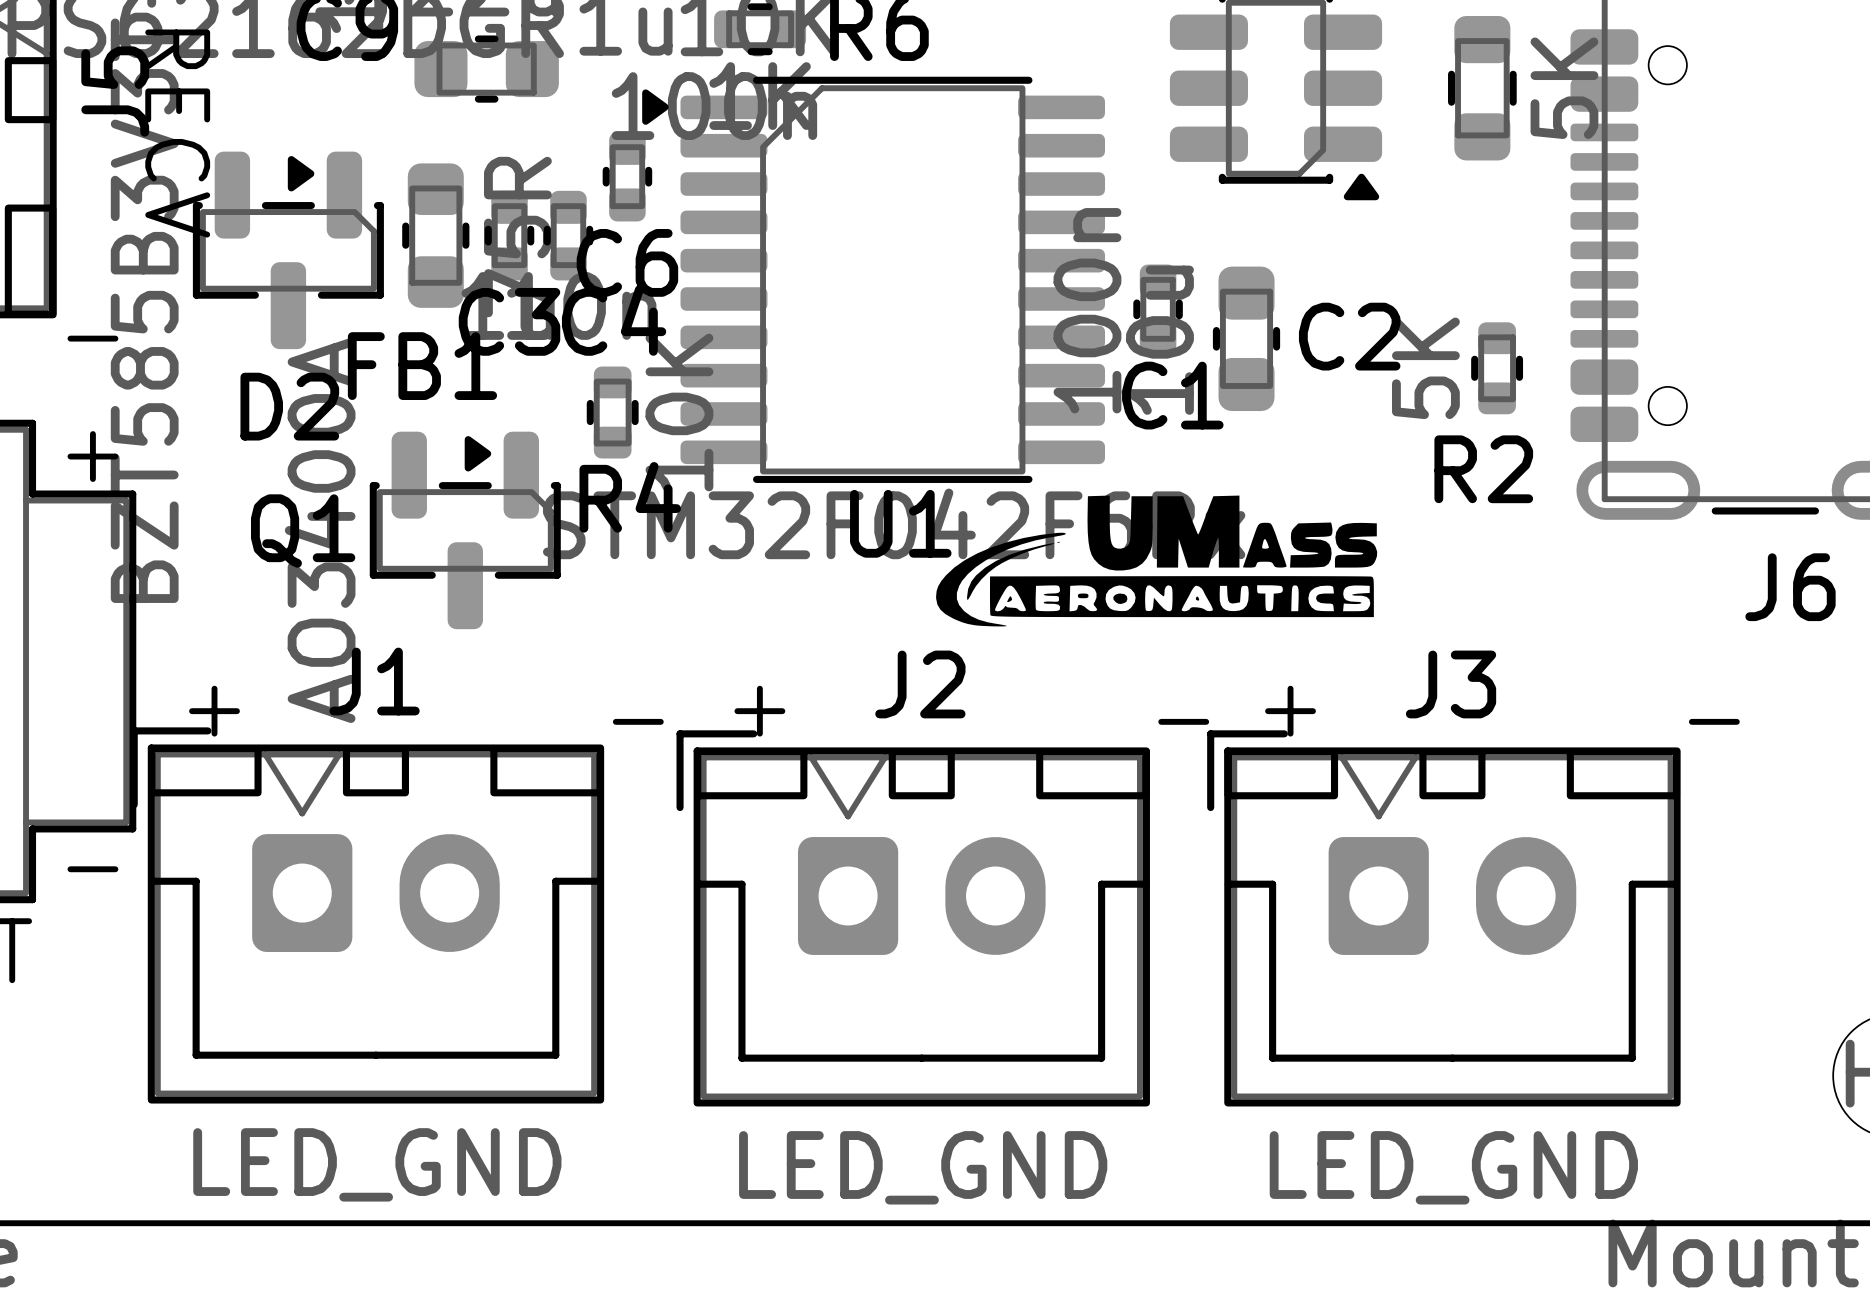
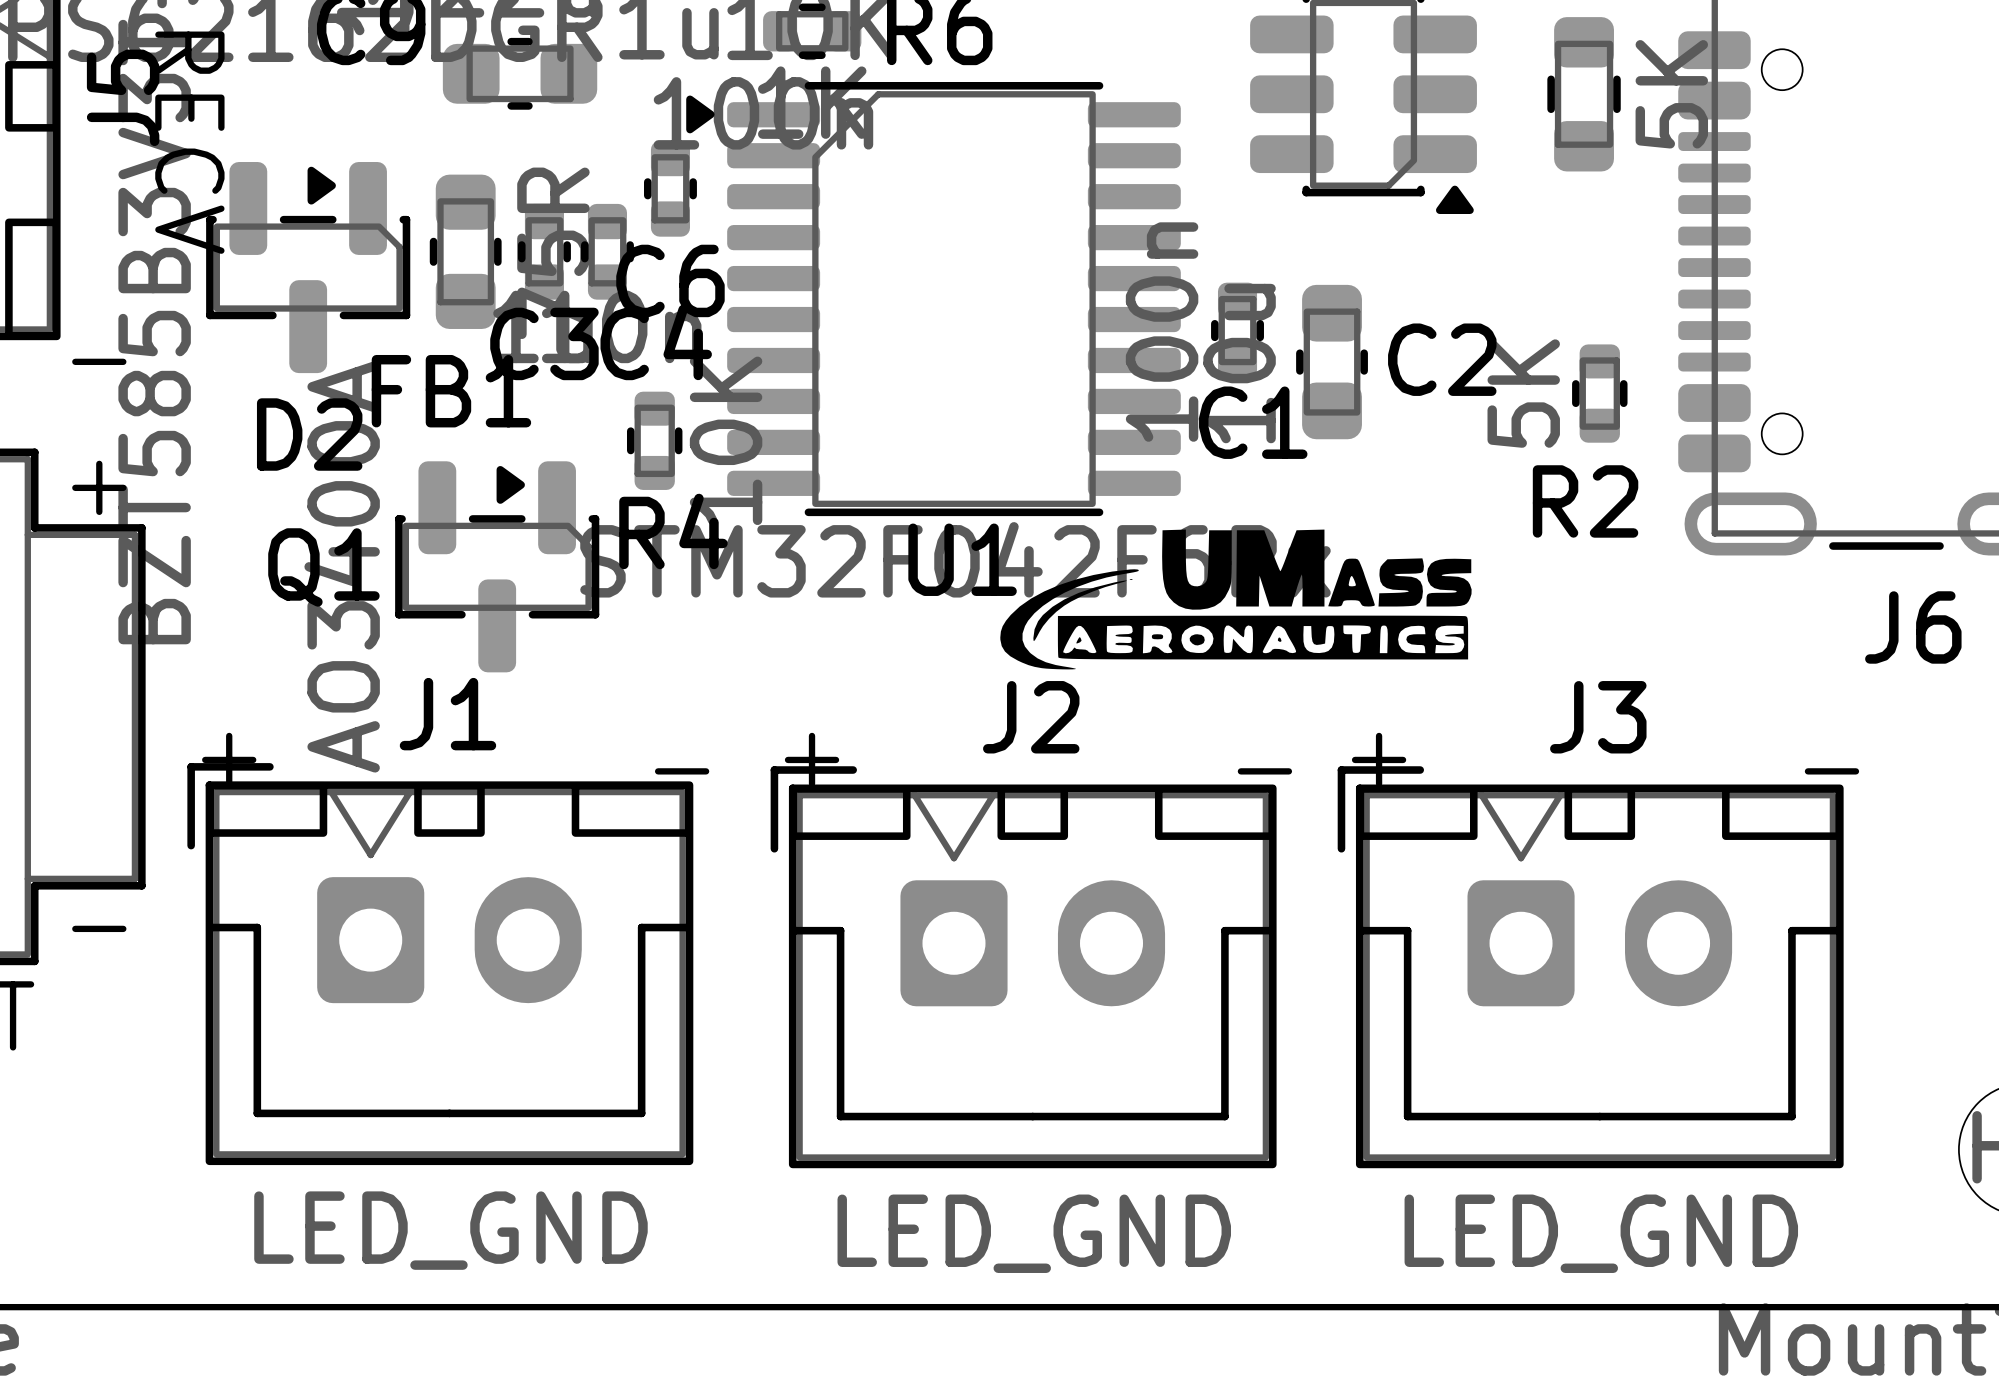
J1 position: (367, 915) -> (440, 964)
J2 position: (913, 918) -> (1023, 967)
J3 position: (1443, 918) -> (1590, 967)

